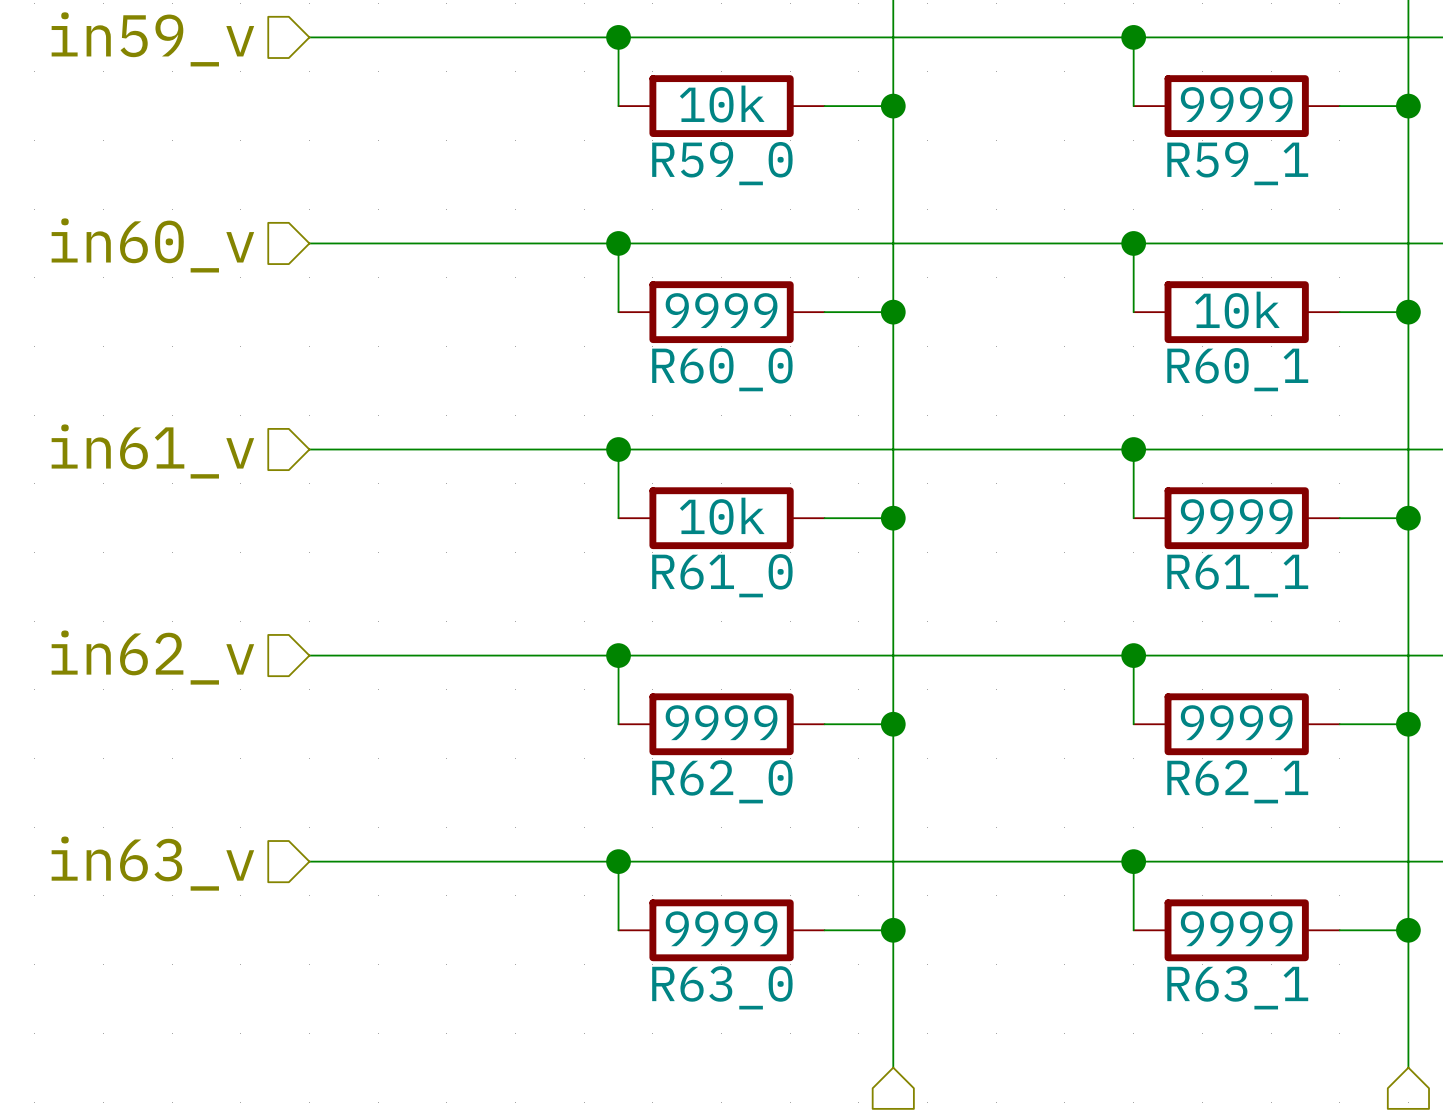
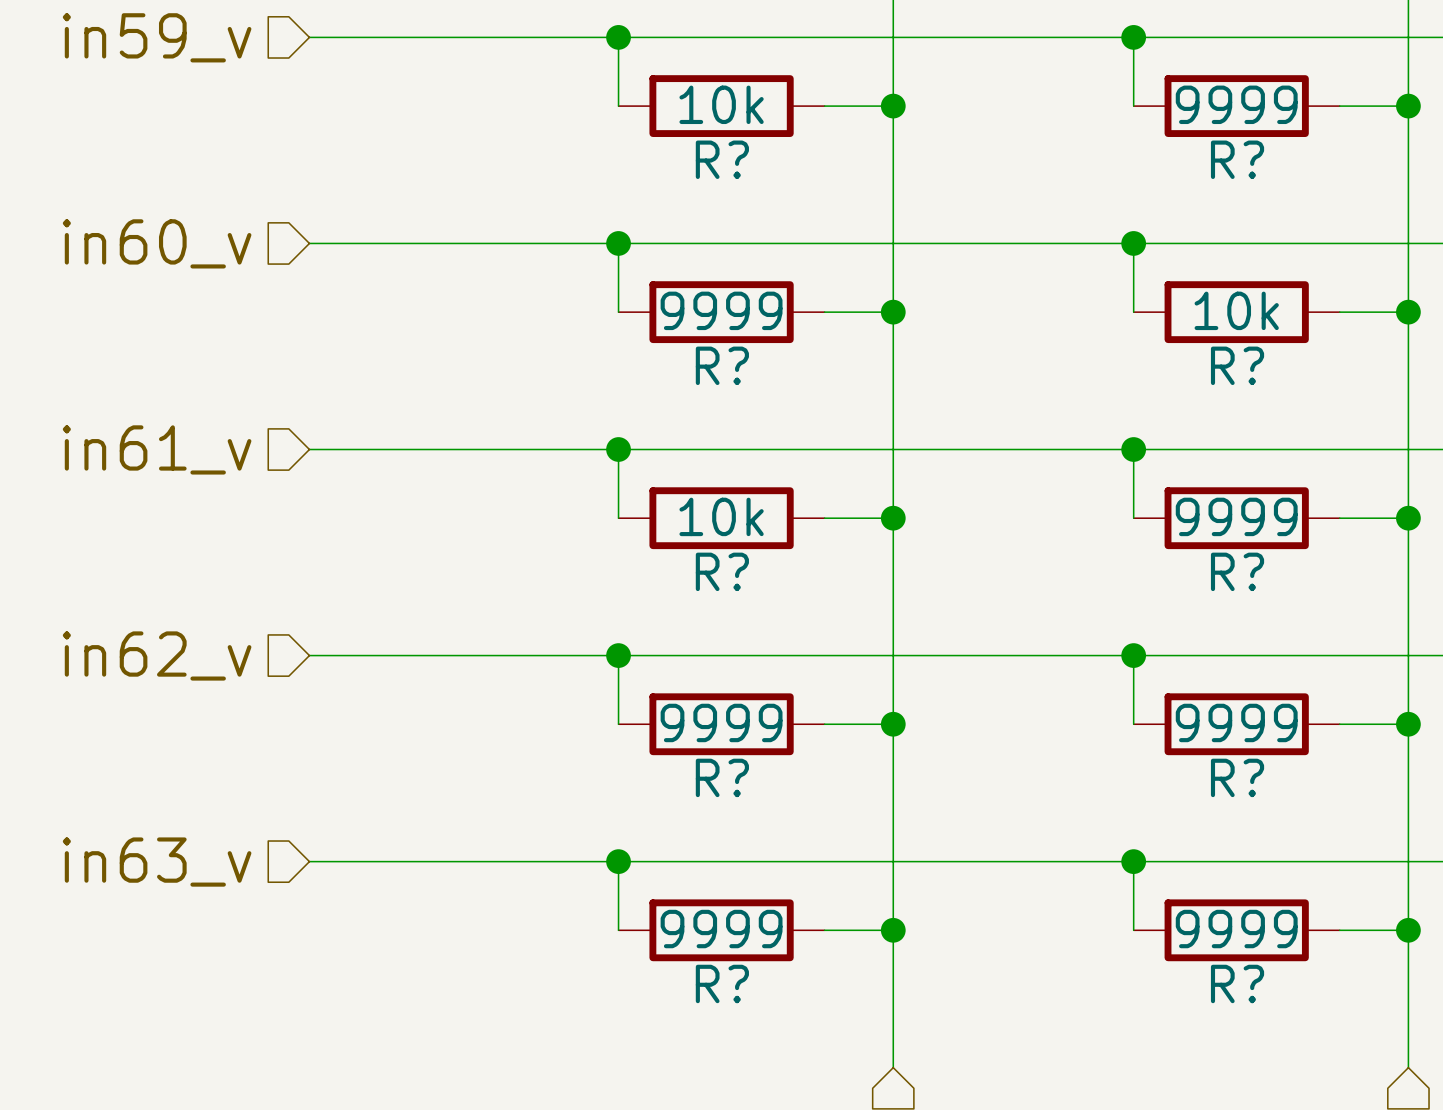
R59_0 name: R59_0 (722, 163) -> R? (722, 159)
R59_1 name: R59_1 (1237, 163) -> R? (1237, 159)
R60_0 name: R60_0 (722, 369) -> R? (722, 365)
R60_1 name: R60_1 (1237, 369) -> R? (1237, 365)
R61_0 name: R61_0 (722, 575) -> R? (722, 571)
R61_1 name: R61_1 (1237, 576) -> R? (1237, 571)
R62_0 name: R62_0 (722, 781) -> R? (722, 777)
R62_1 name: R62_1 (1237, 781) -> R? (1237, 777)
R63_0 name: R63_0 (722, 987) -> R? (722, 983)
R63_1 name: R63_1 (1237, 987) -> R? (1237, 983)

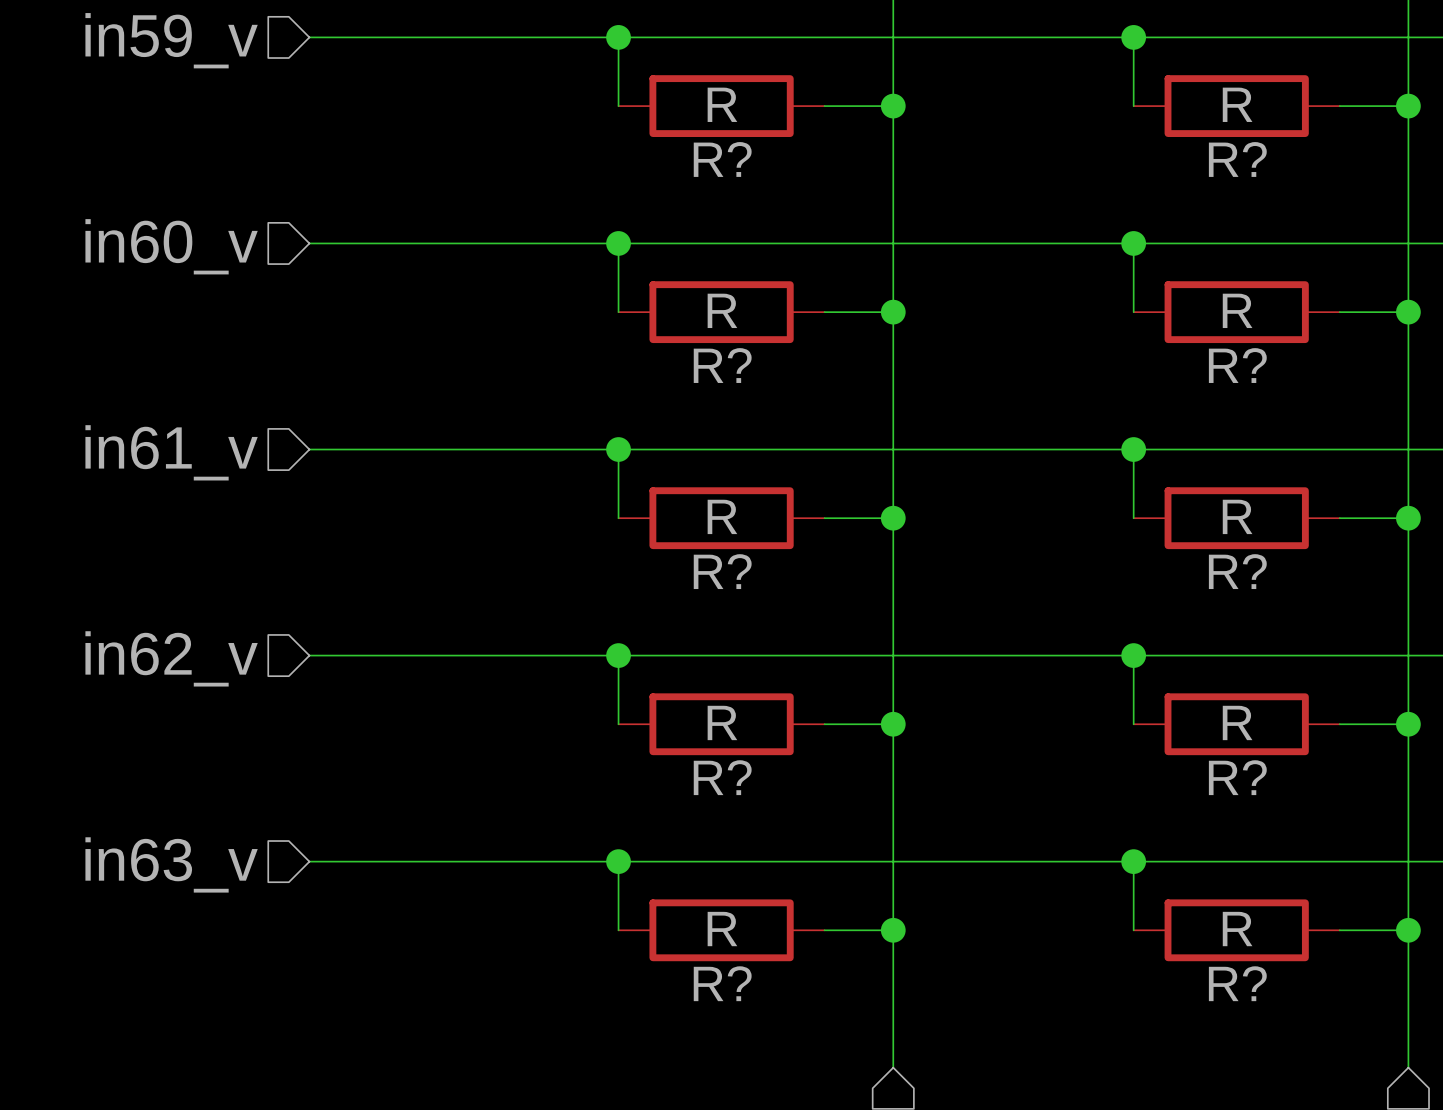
R? value: 10k (721, 104) -> R (722, 104)
R? value: 9999 (1236, 104) -> R (1237, 104)
R? value: 9999 (721, 310) -> R (722, 310)
R? value: 10k (1236, 310) -> R (1237, 310)
R? value: 10k (721, 516) -> R (722, 516)
R? value: 9999 (1236, 516) -> R (1237, 516)
R? value: 9999 (721, 722) -> R (722, 722)
R? value: 9999 (1236, 722) -> R (1237, 722)
R? value: 9999 (721, 929) -> R (722, 929)
R? value: 9999 (1236, 929) -> R (1237, 929)

